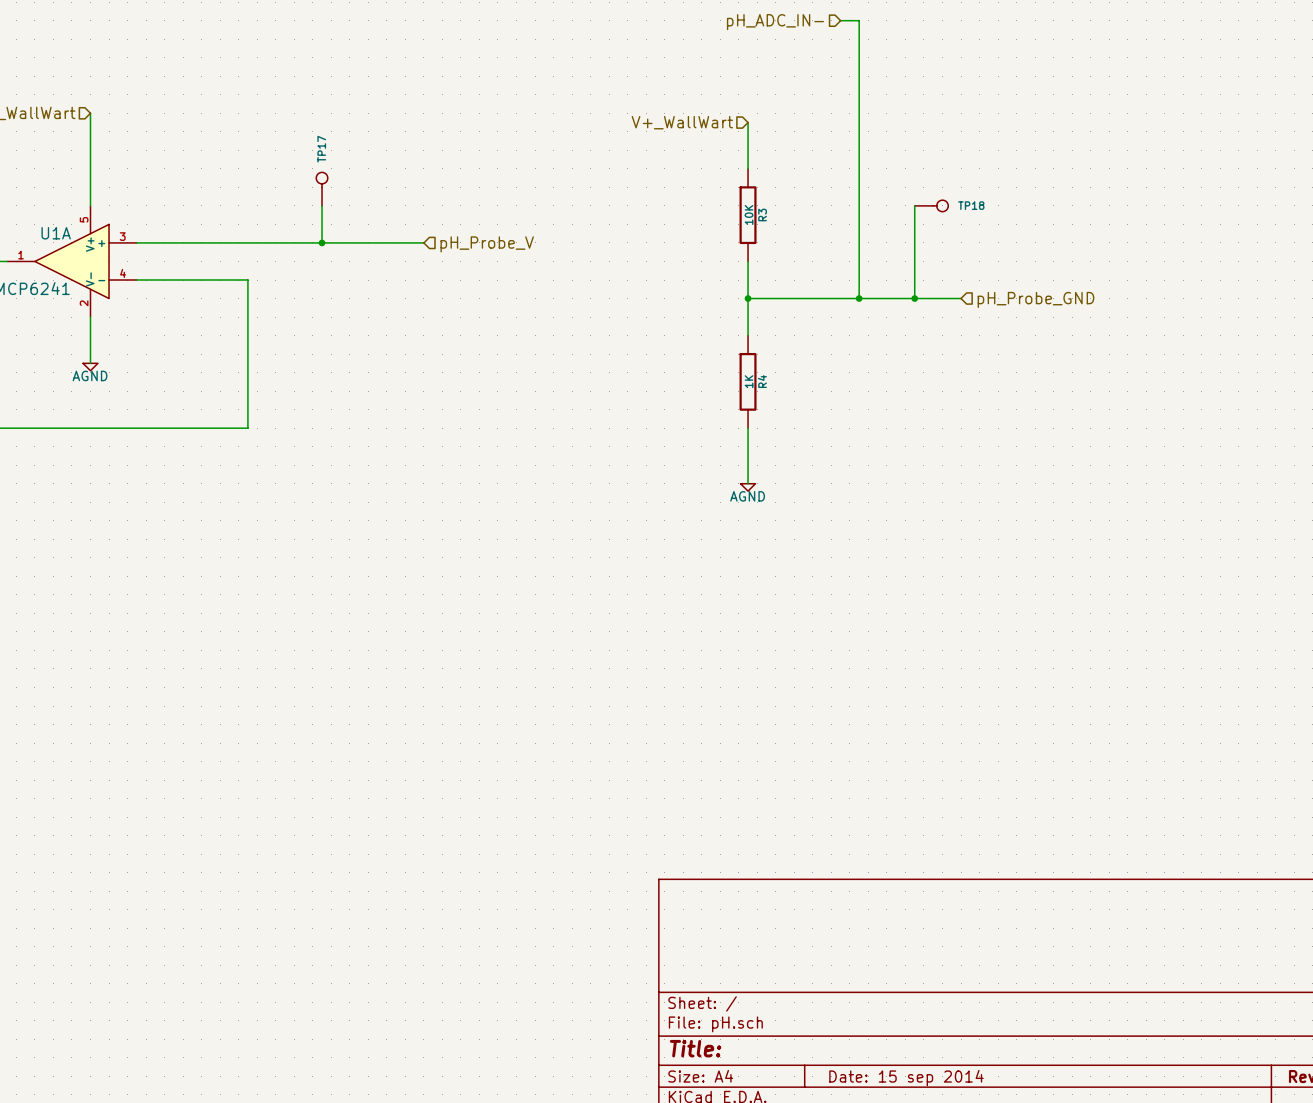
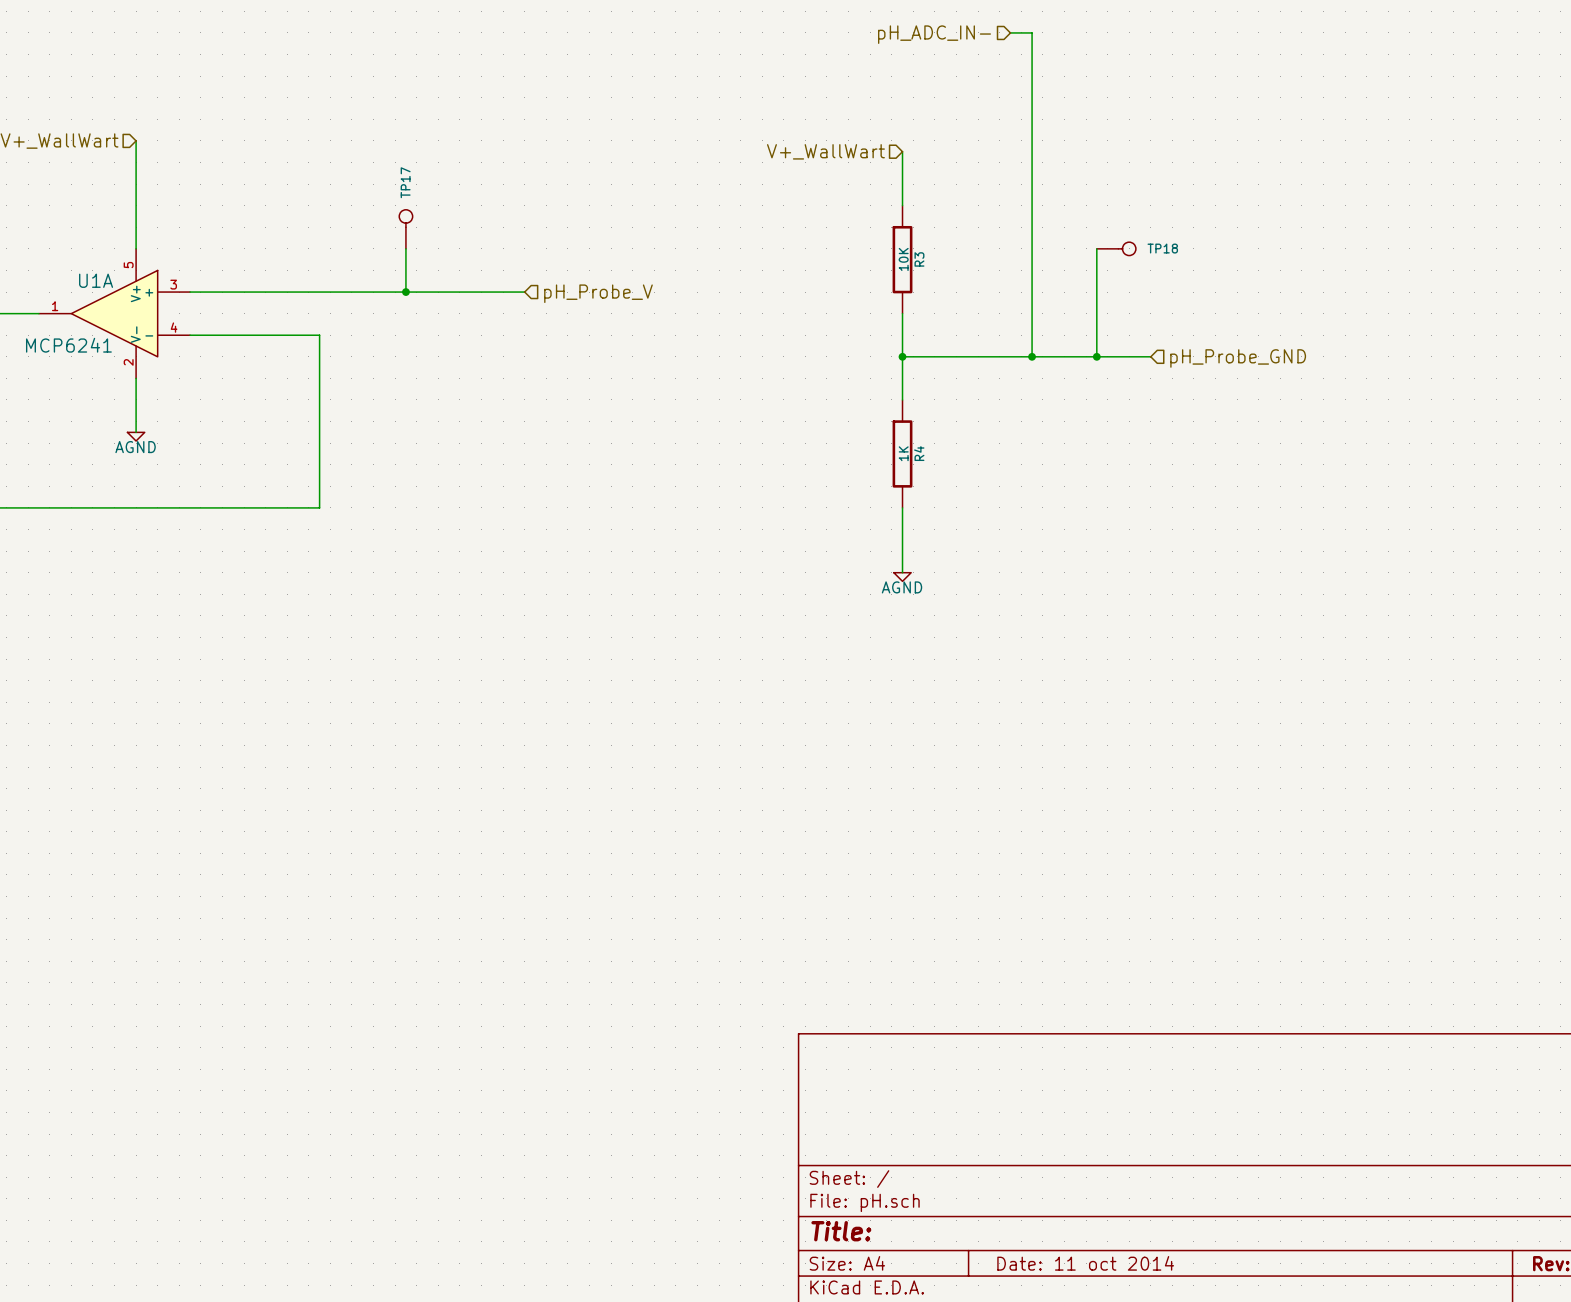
title block: Date: 15 sep 2014 (906, 1078) -> Date: 11 oct 2014 (1085, 1263)

